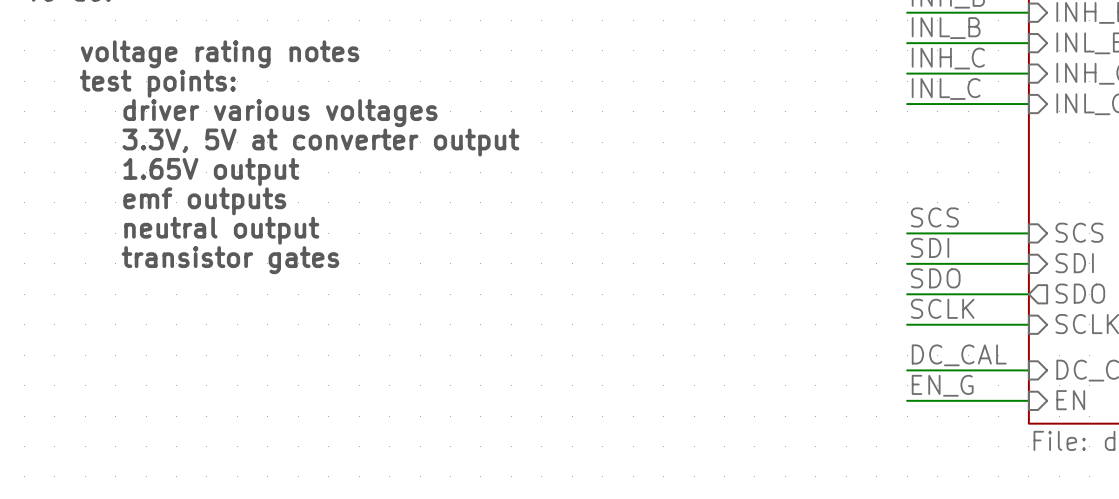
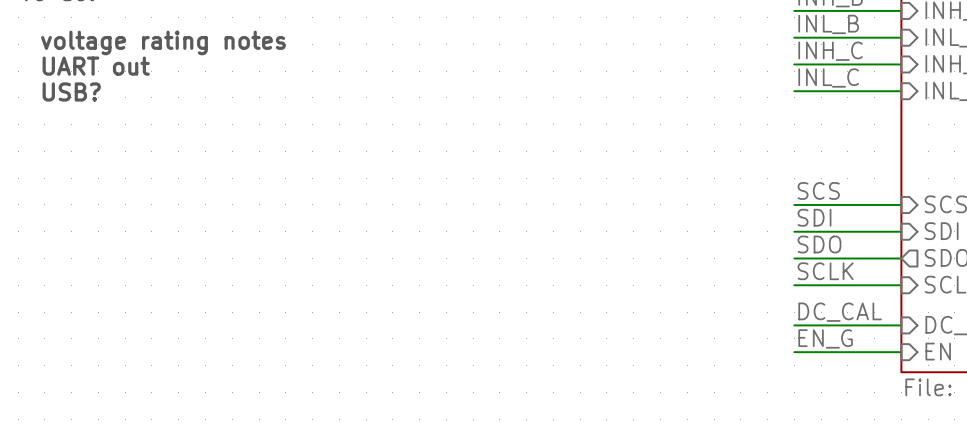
text position: voltage rating notes (220, 54) -> voltage rating notes (163, 42)
text: none -> UART out (96, 66)
text: test points: (157, 83) -> none
text: none -> USB? (71, 91)
text: driver various voltages (280, 113) -> none
text: 3.3V, 5V at converter output (320, 142) -> none
text: 1.65V output (211, 171) -> none
text: emf outputs (204, 201) -> none
text: neutral output (221, 230) -> none
text: transistor gates (230, 260) -> none

